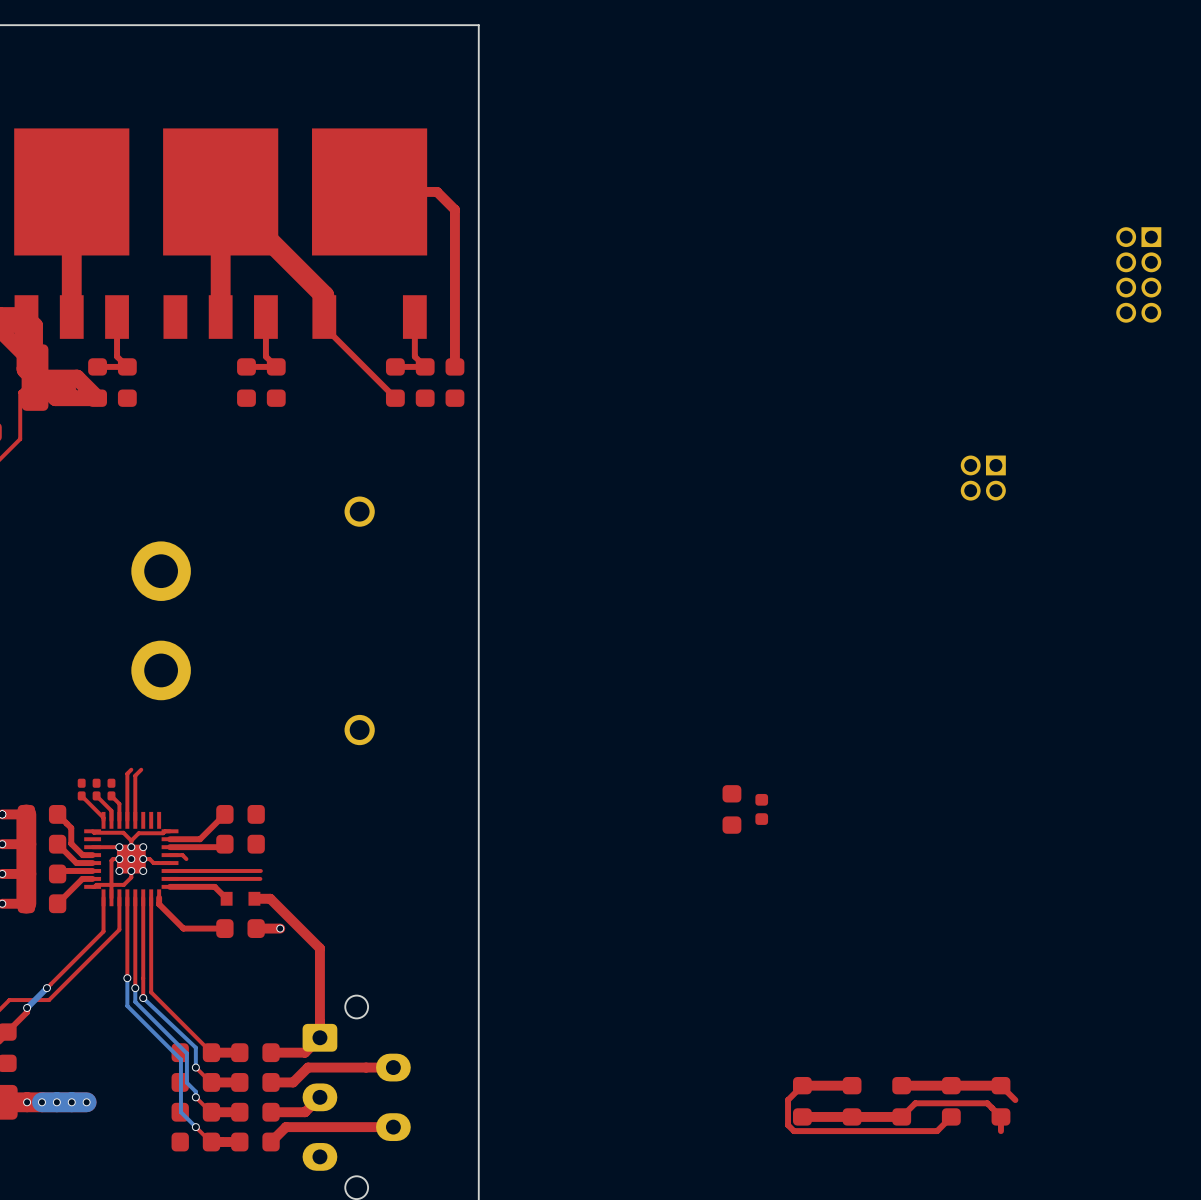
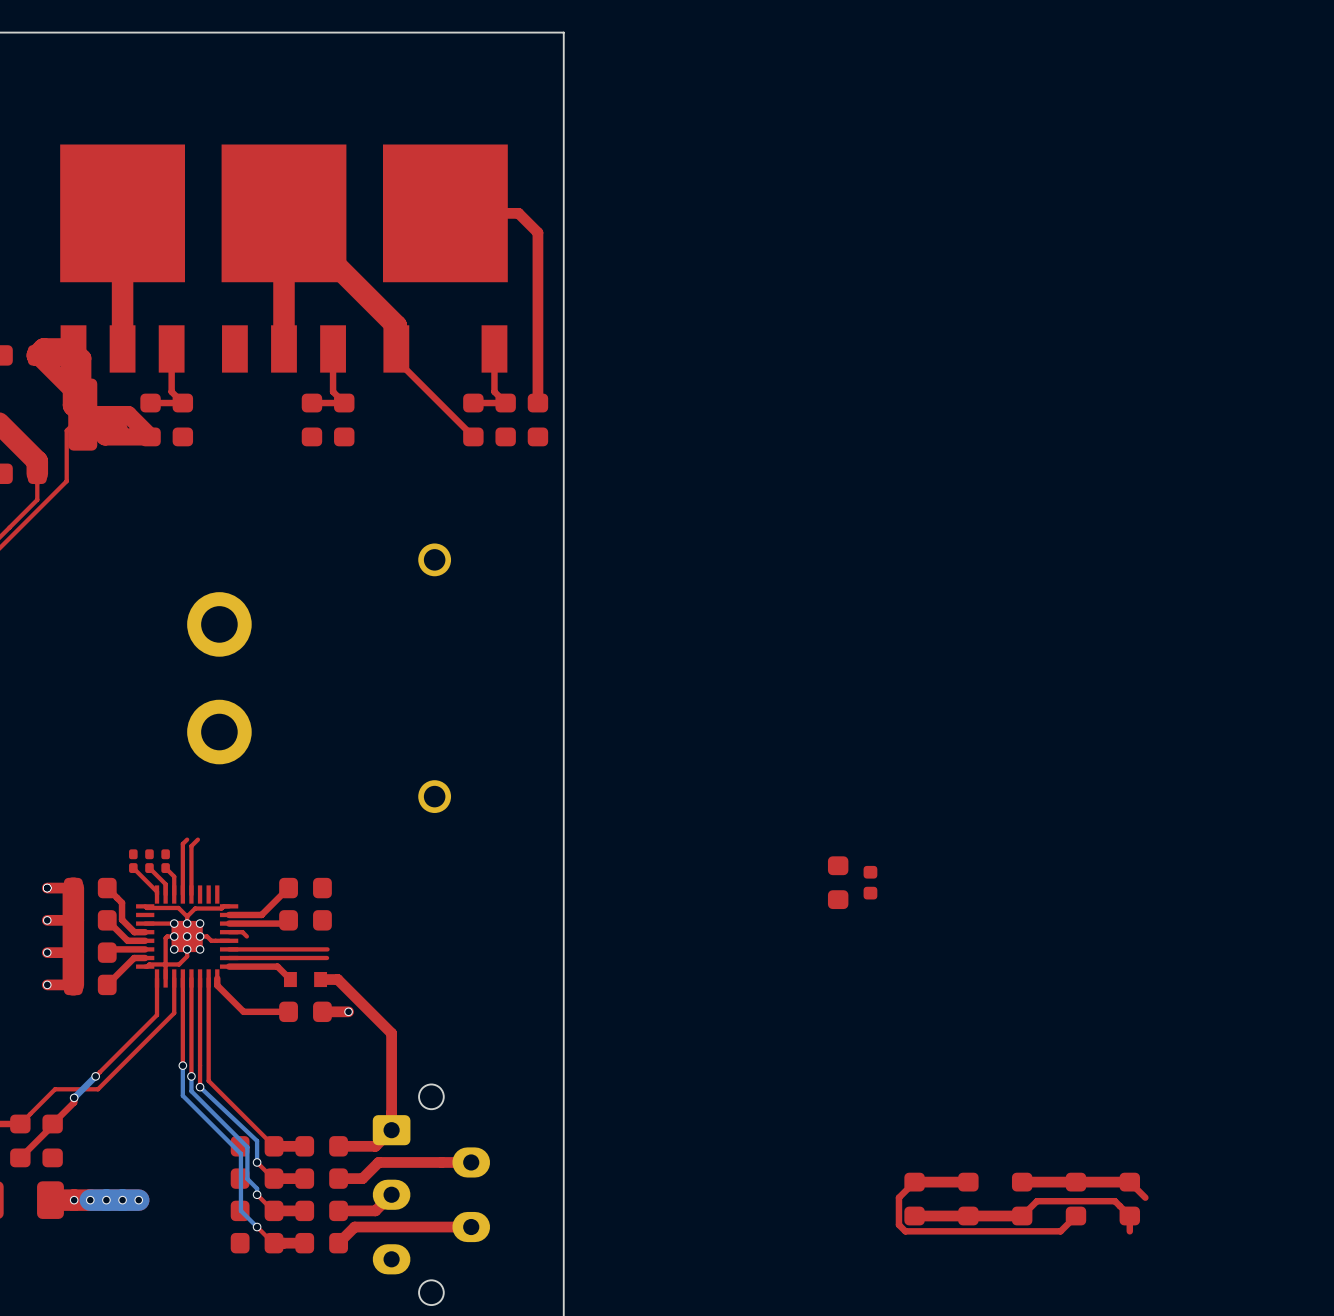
part: (1138, 274) -> none
part: (983, 478) -> none

